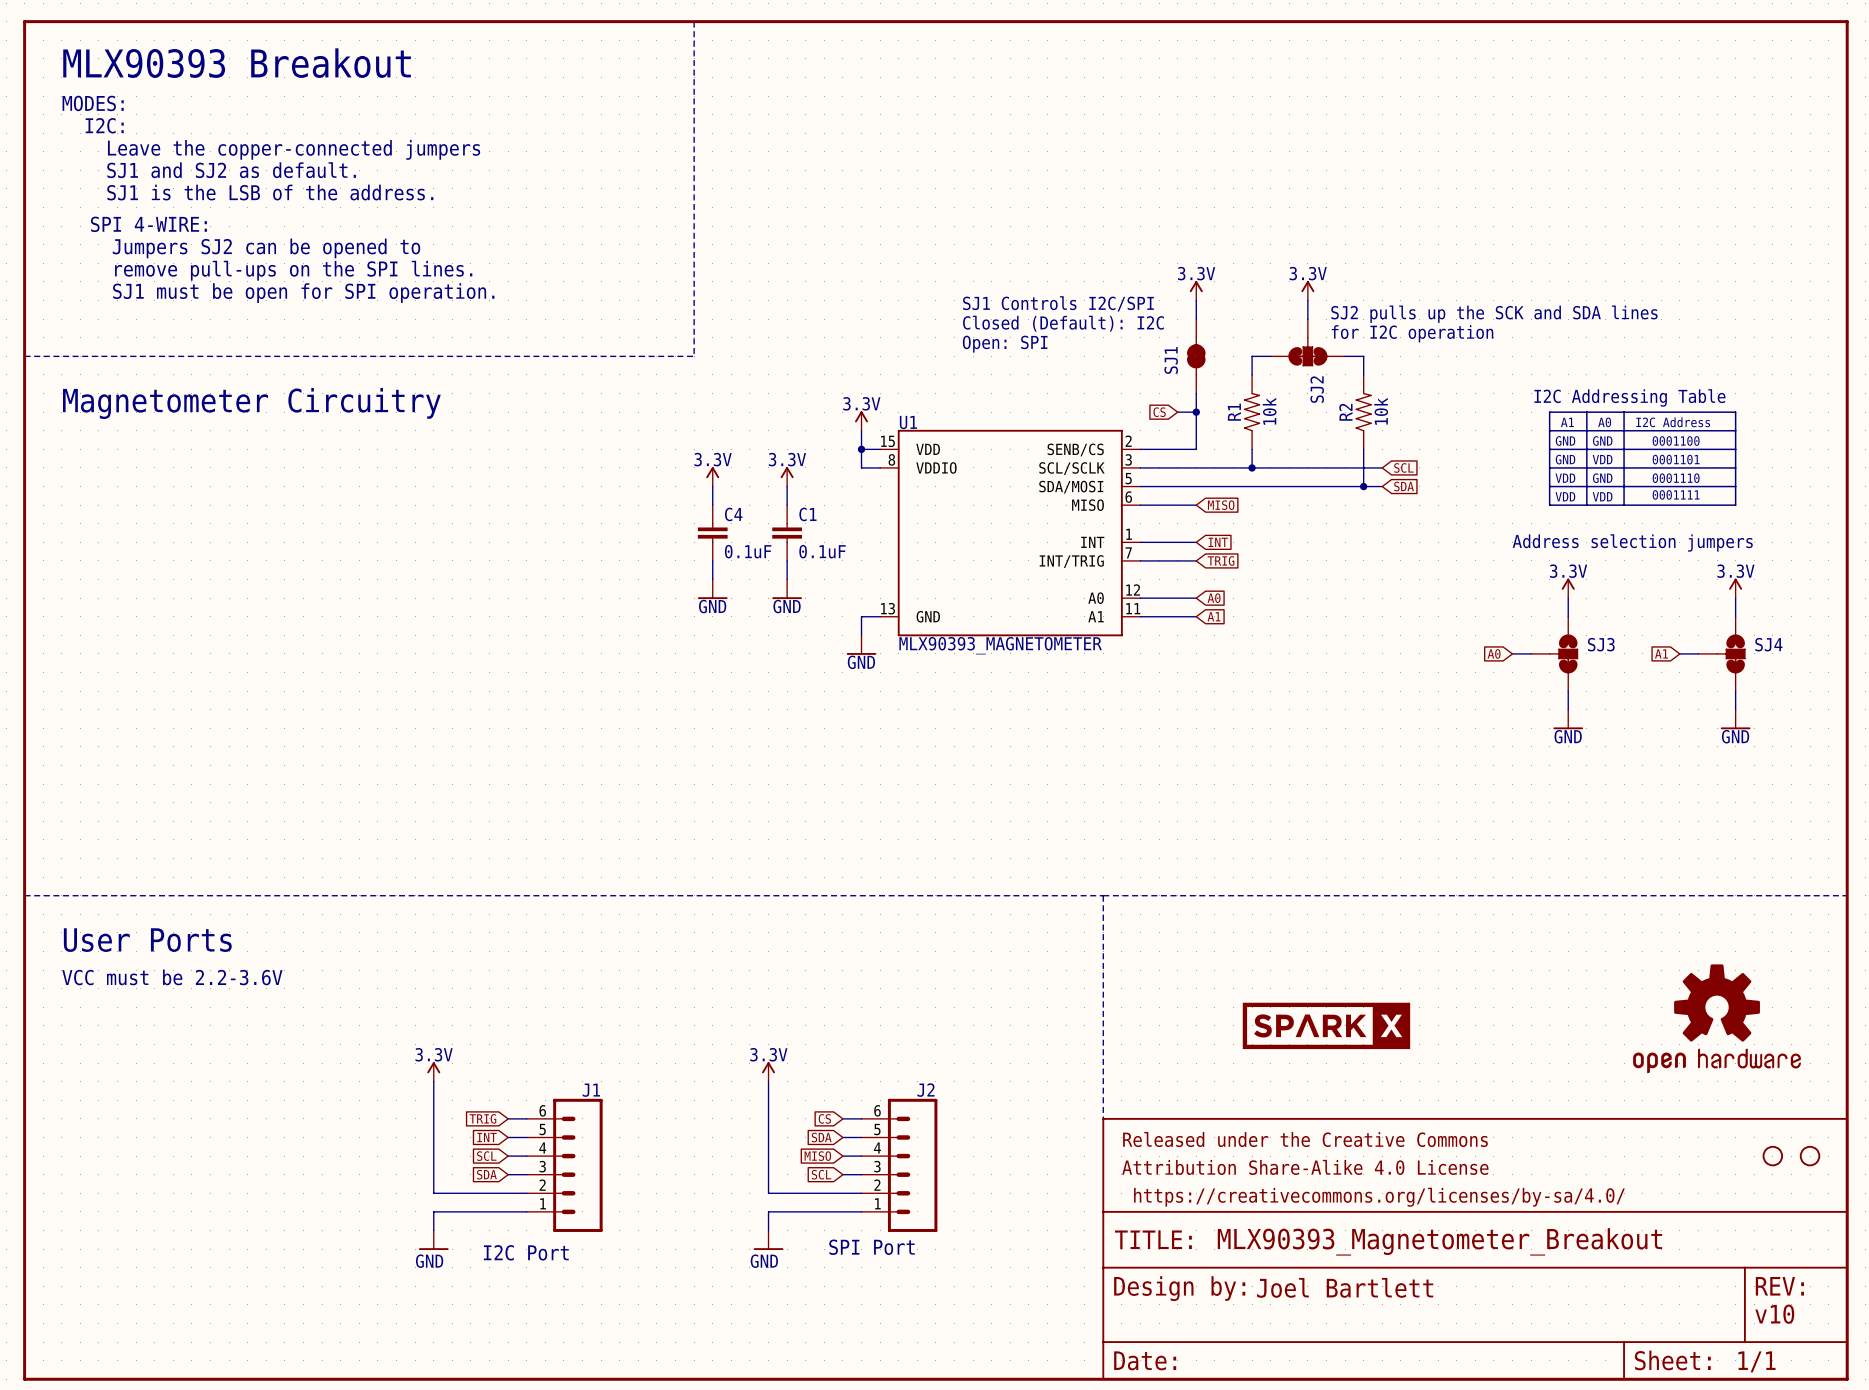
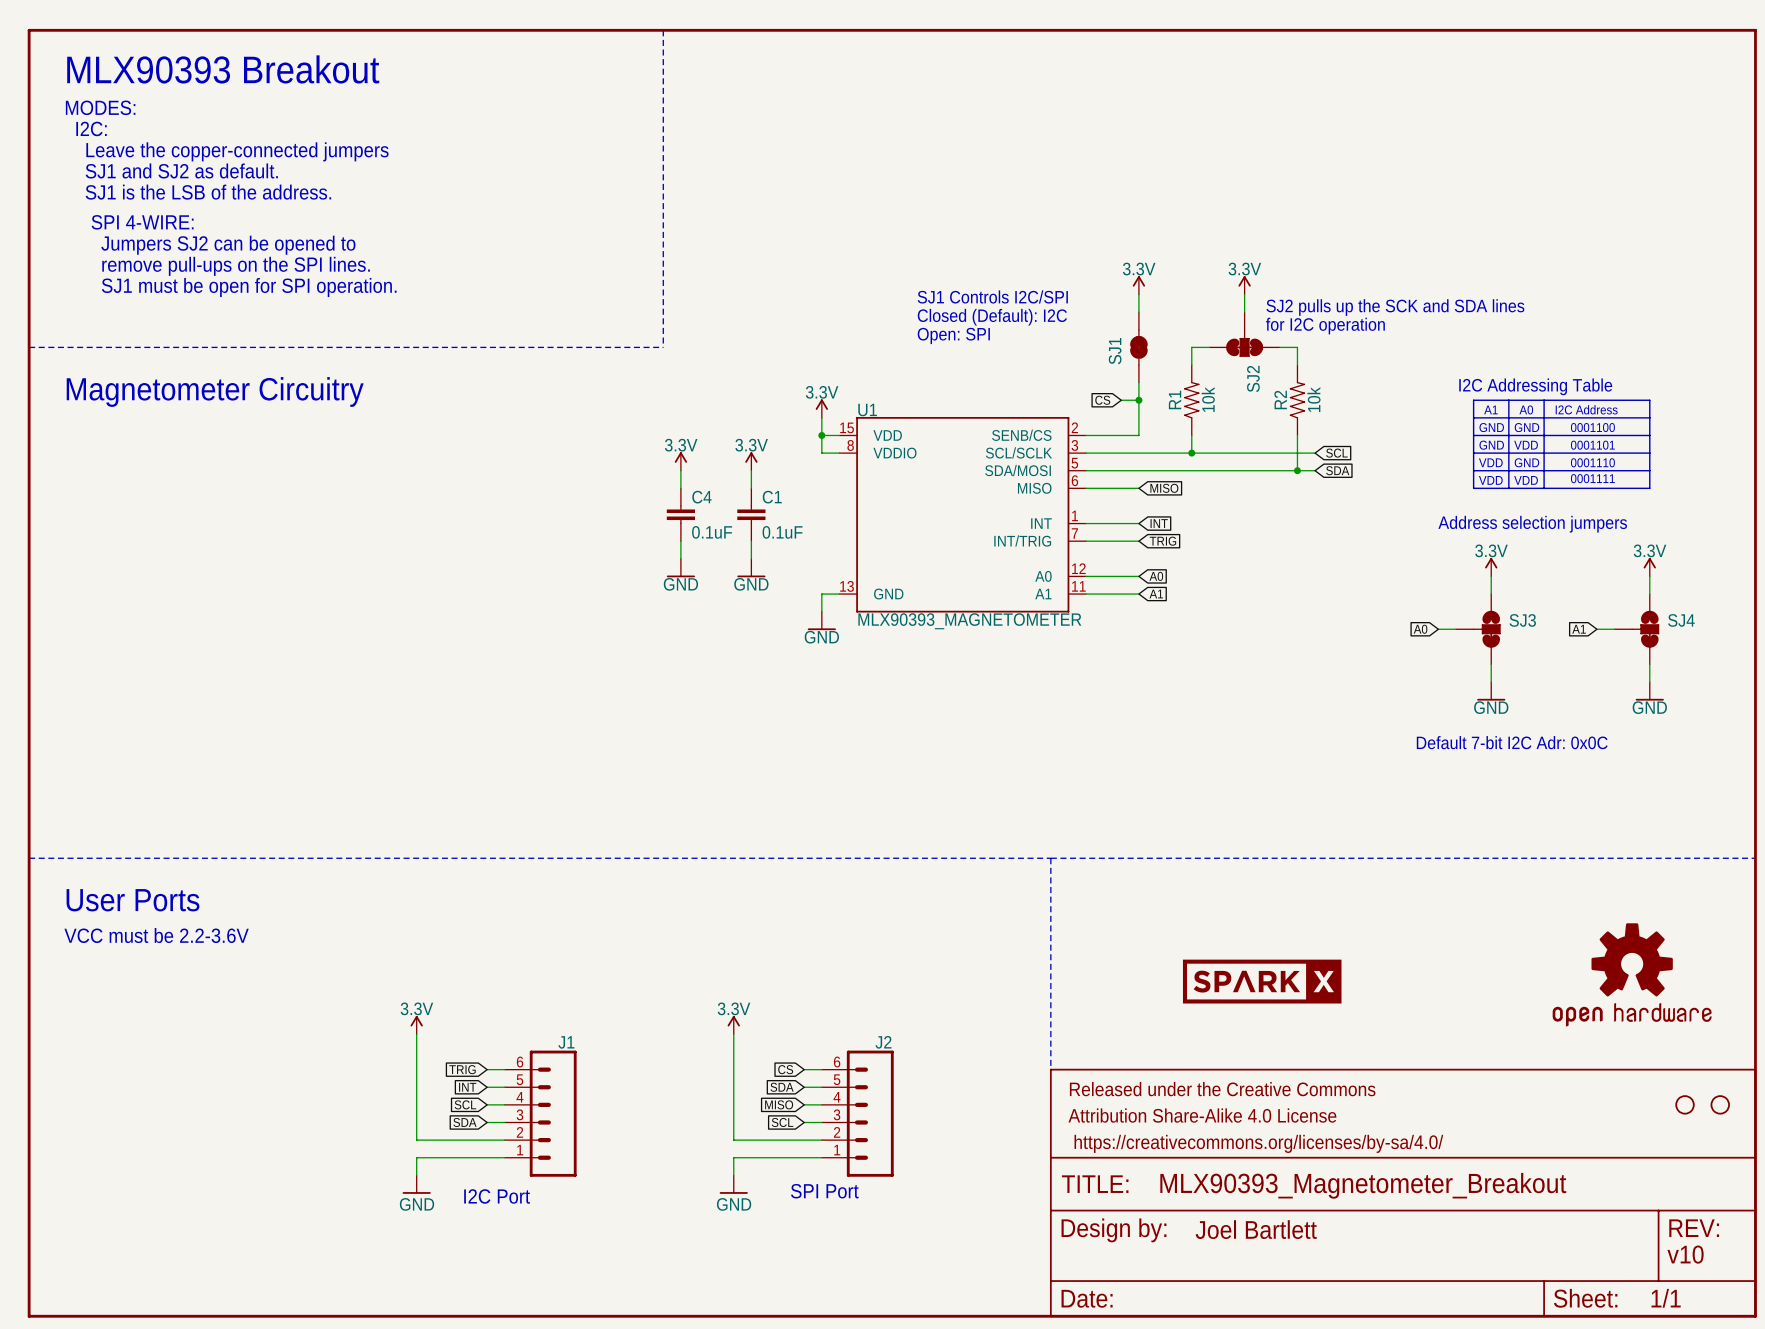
text: none -> Default 7-bit I2C Adr: 0x0C (1512, 742)

